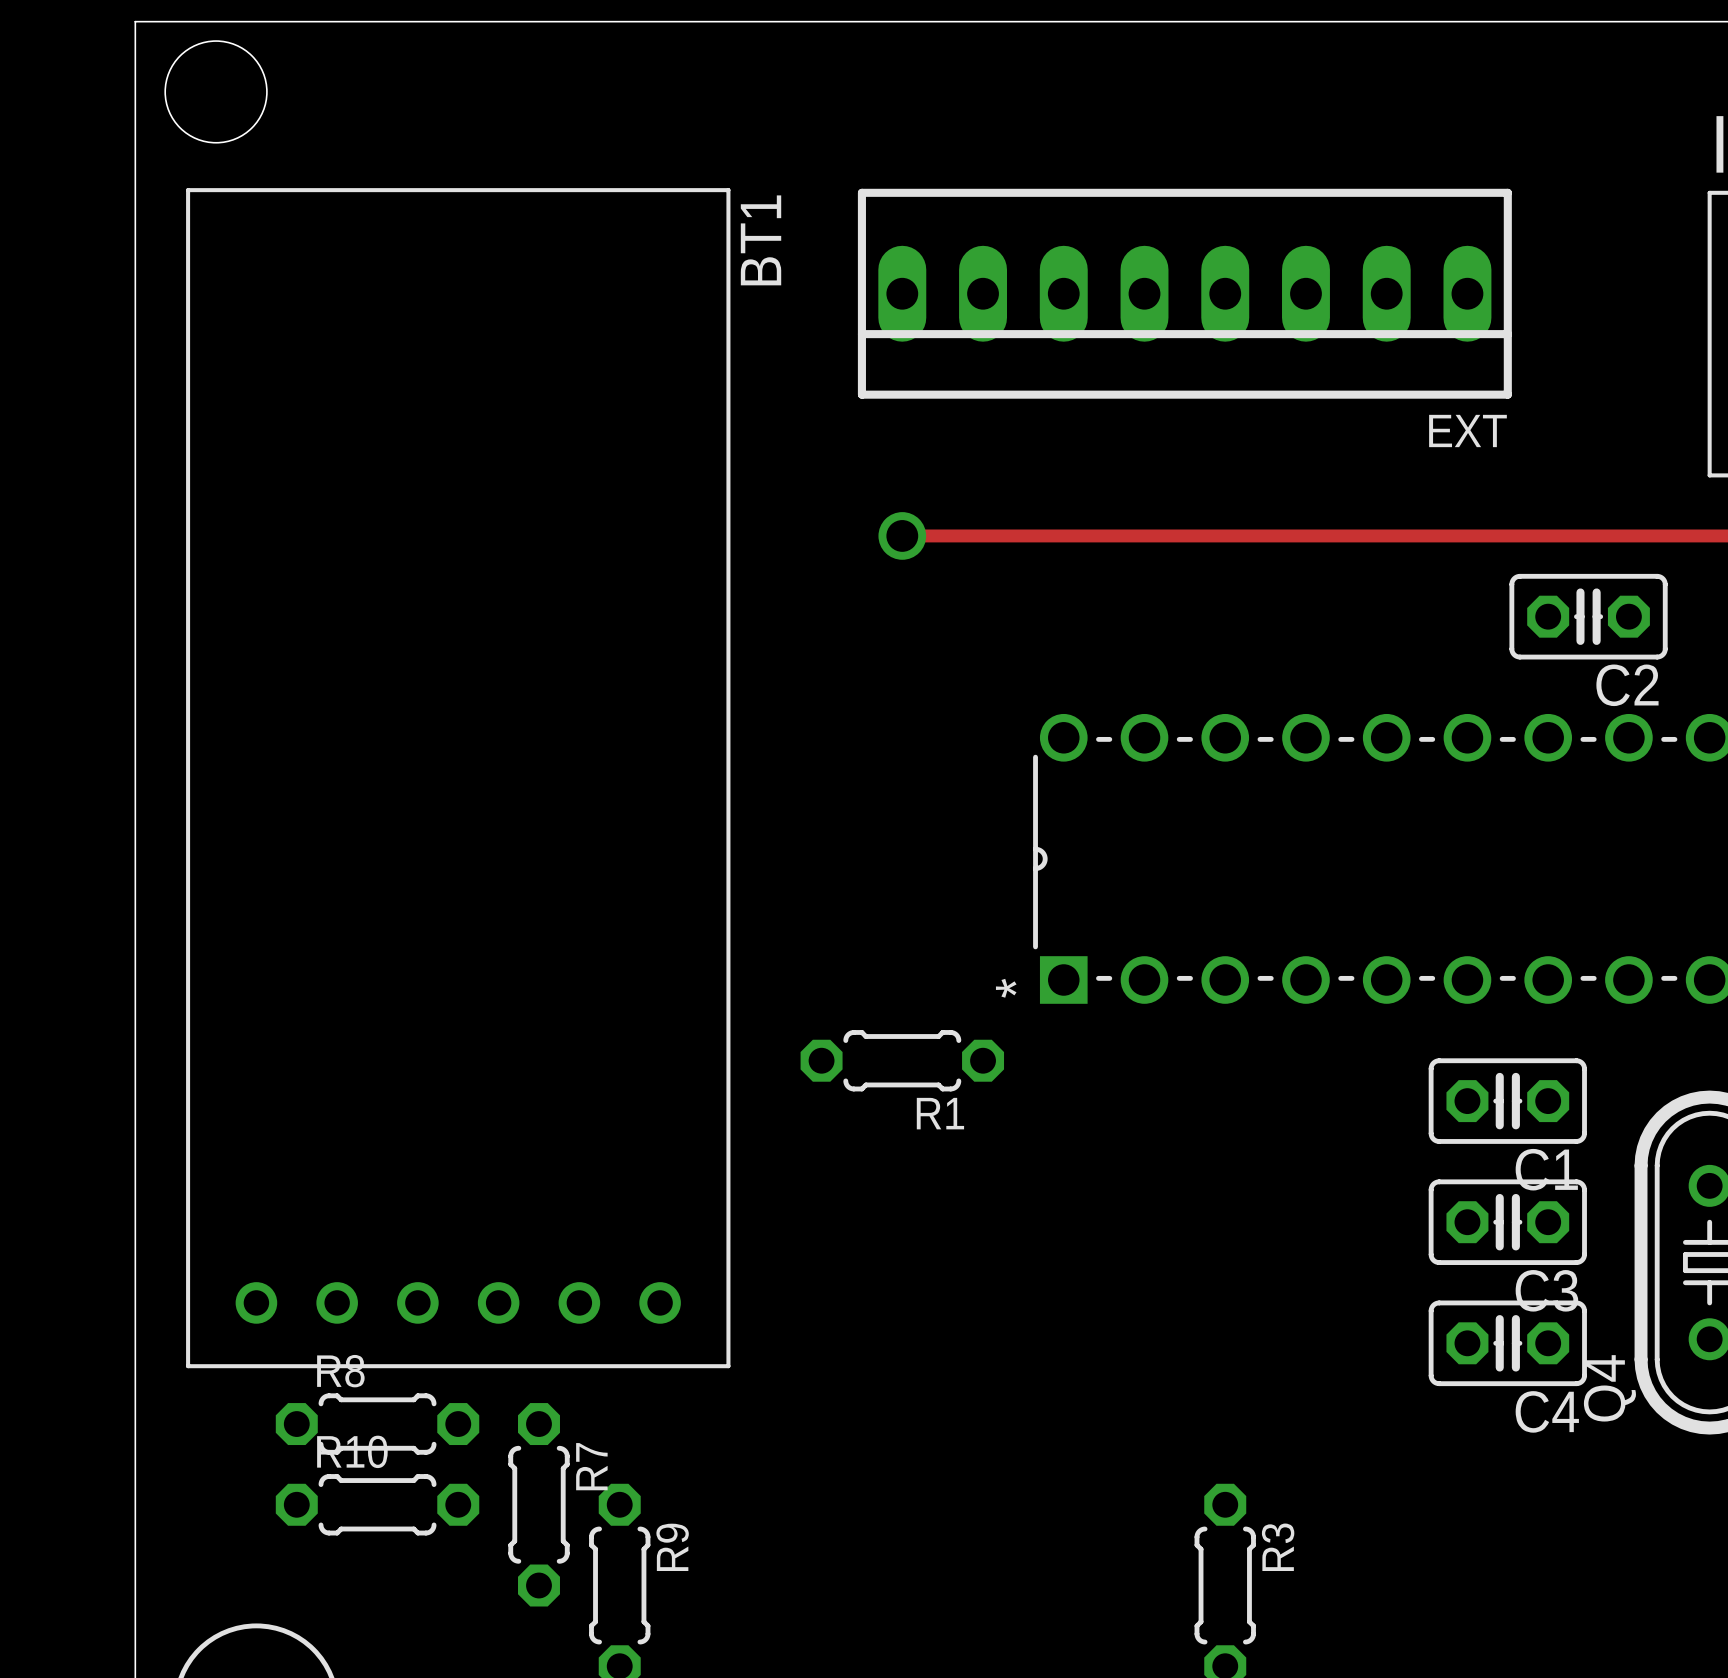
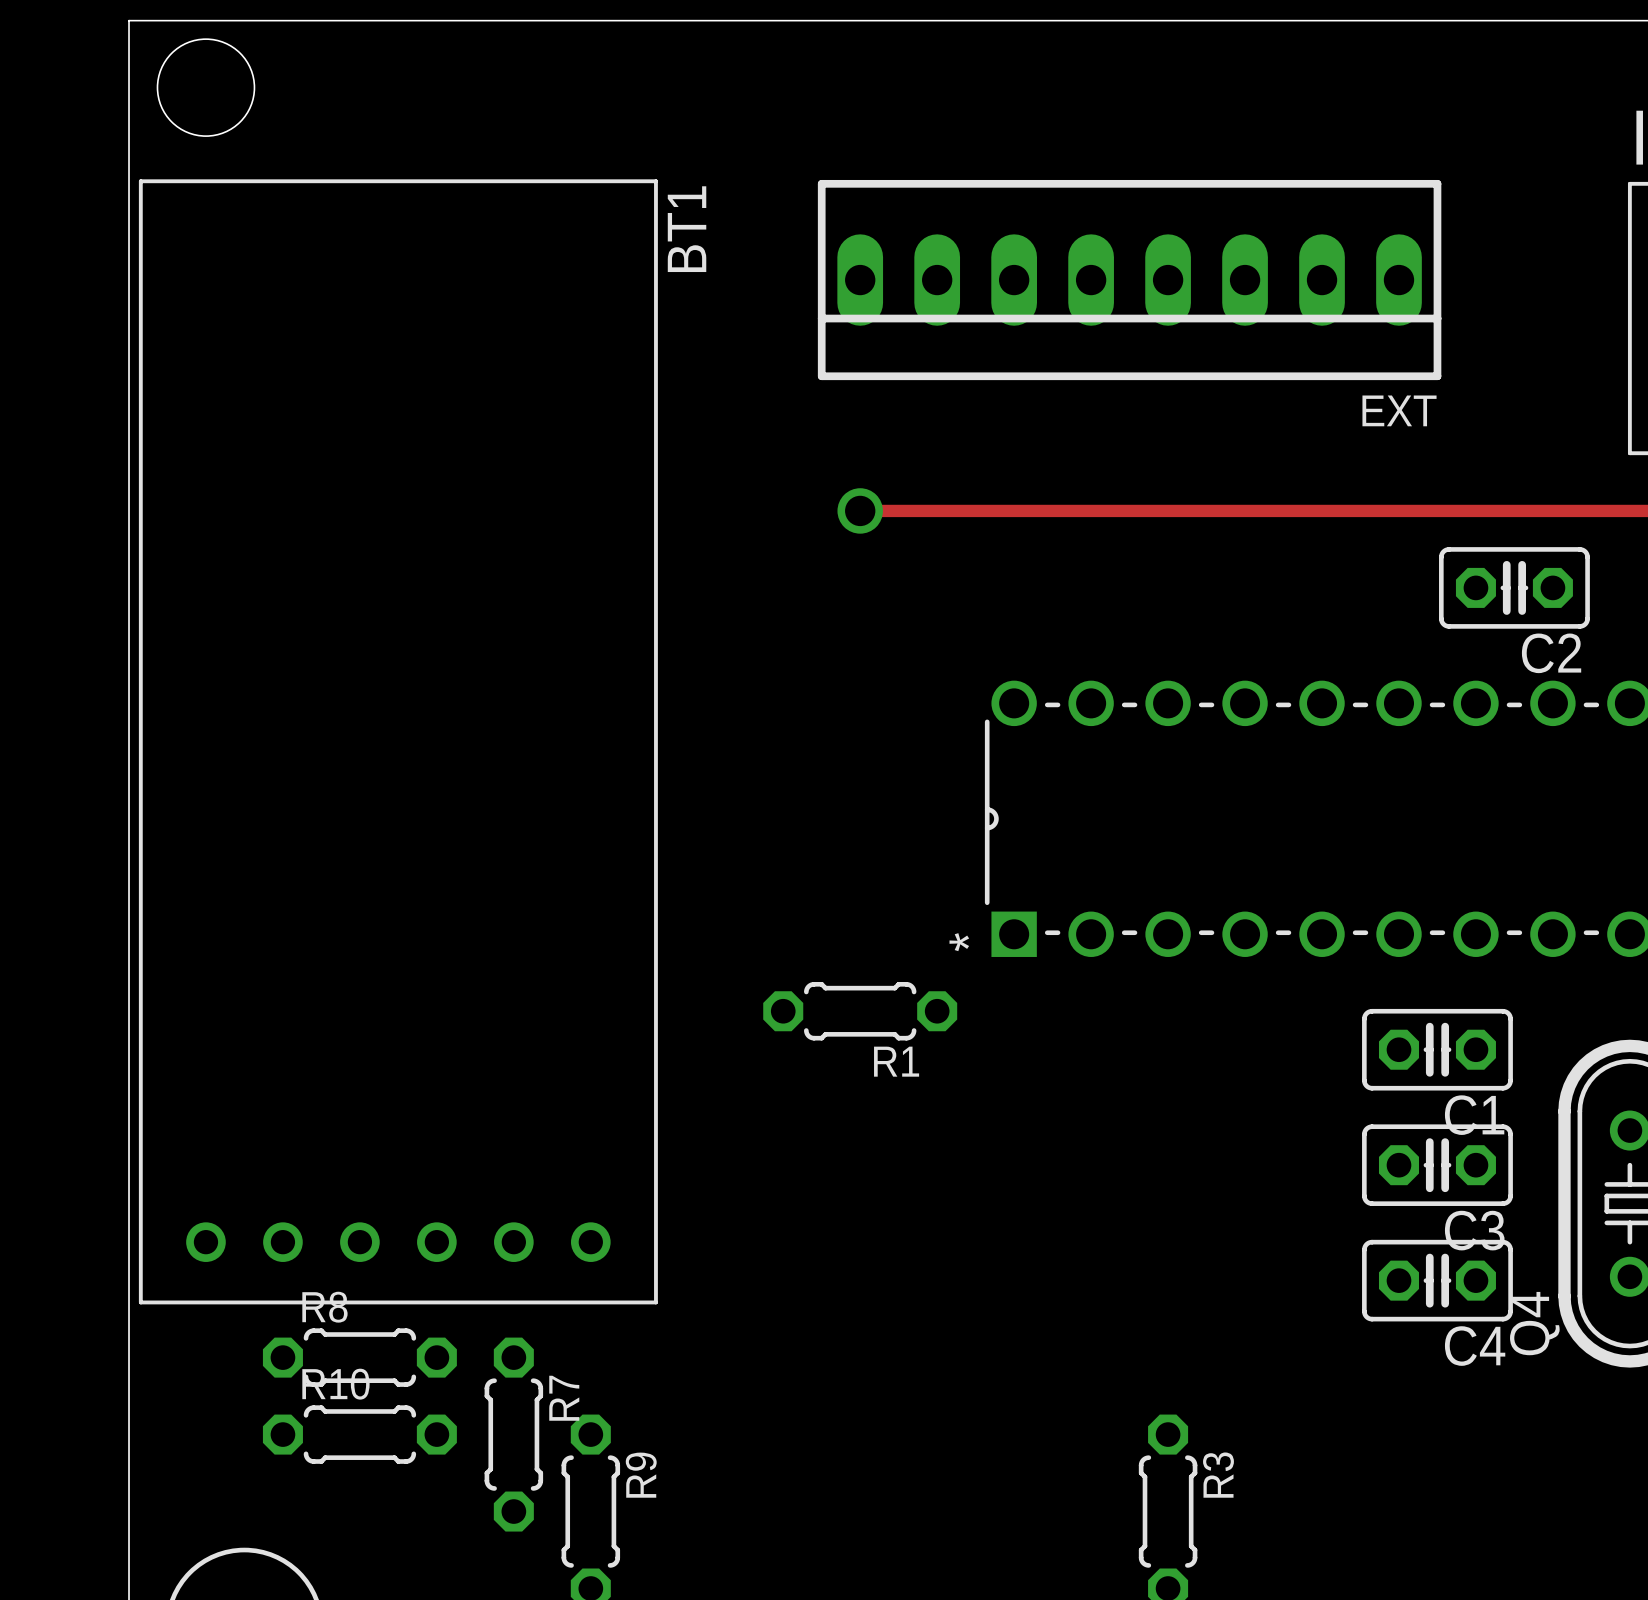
BT1 position: (458, 778) -> (398, 741)

